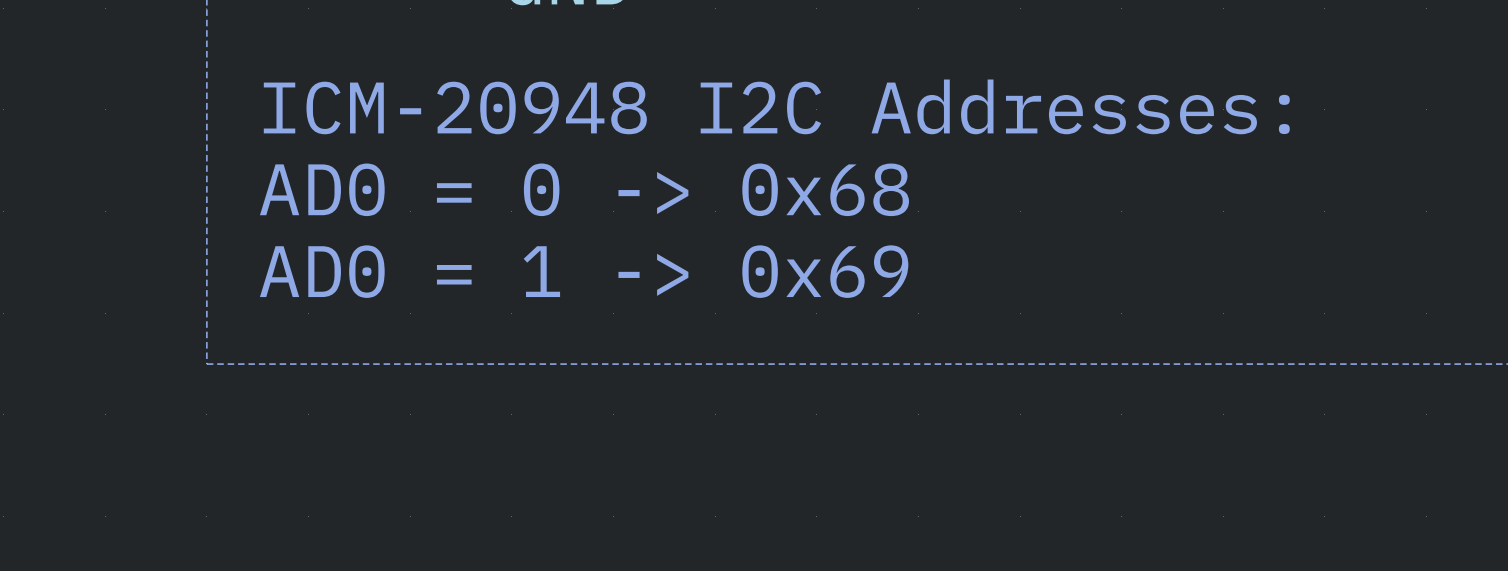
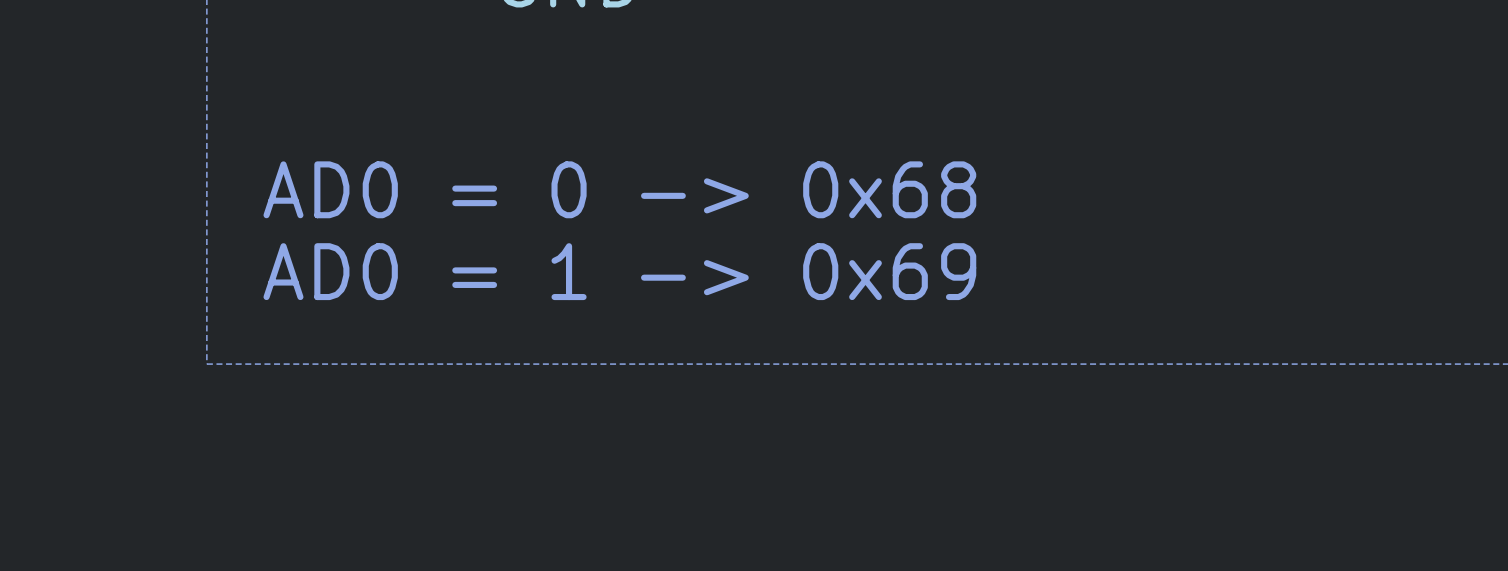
text: ICM-20948 I2C Addresses: (776, 106) -> none

